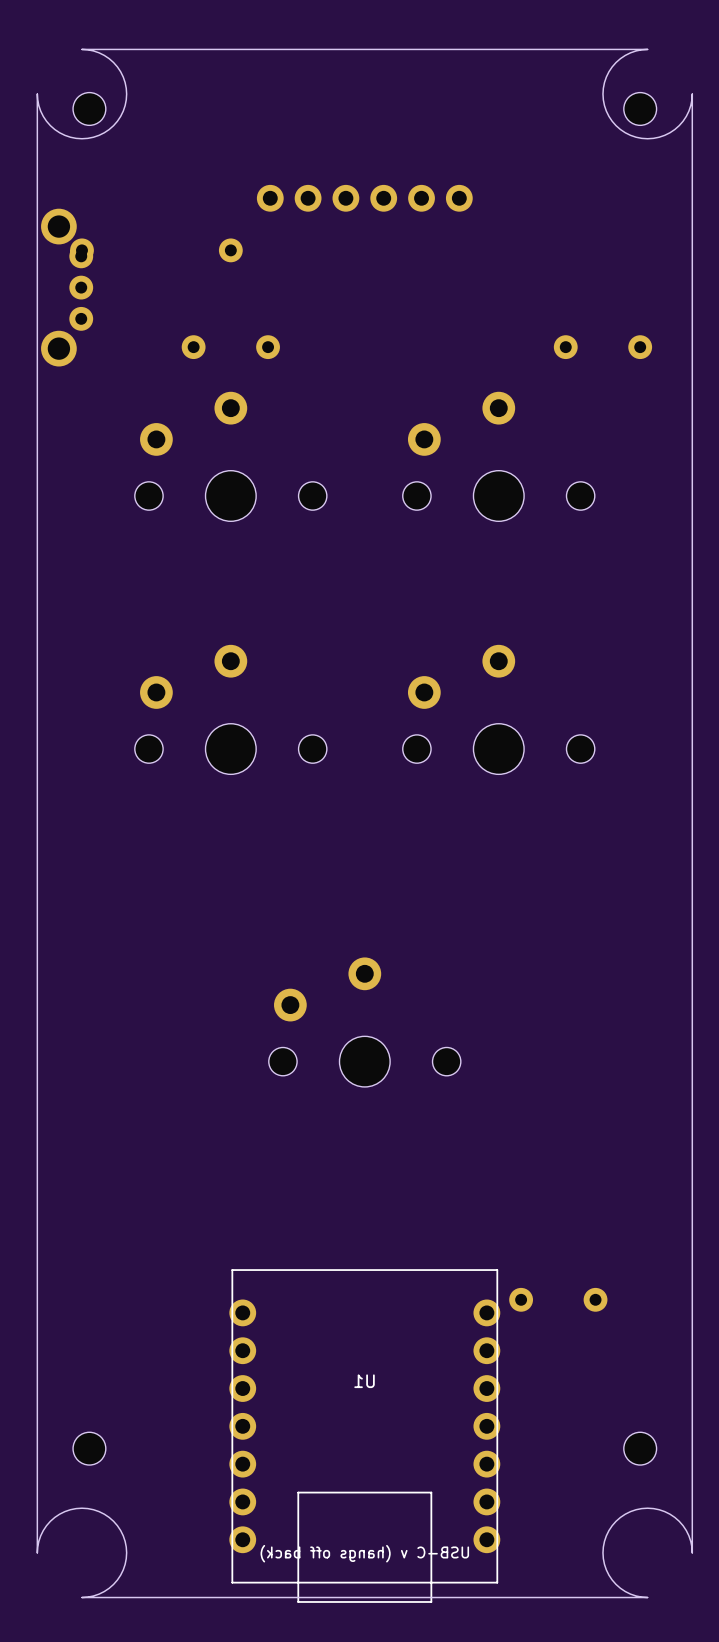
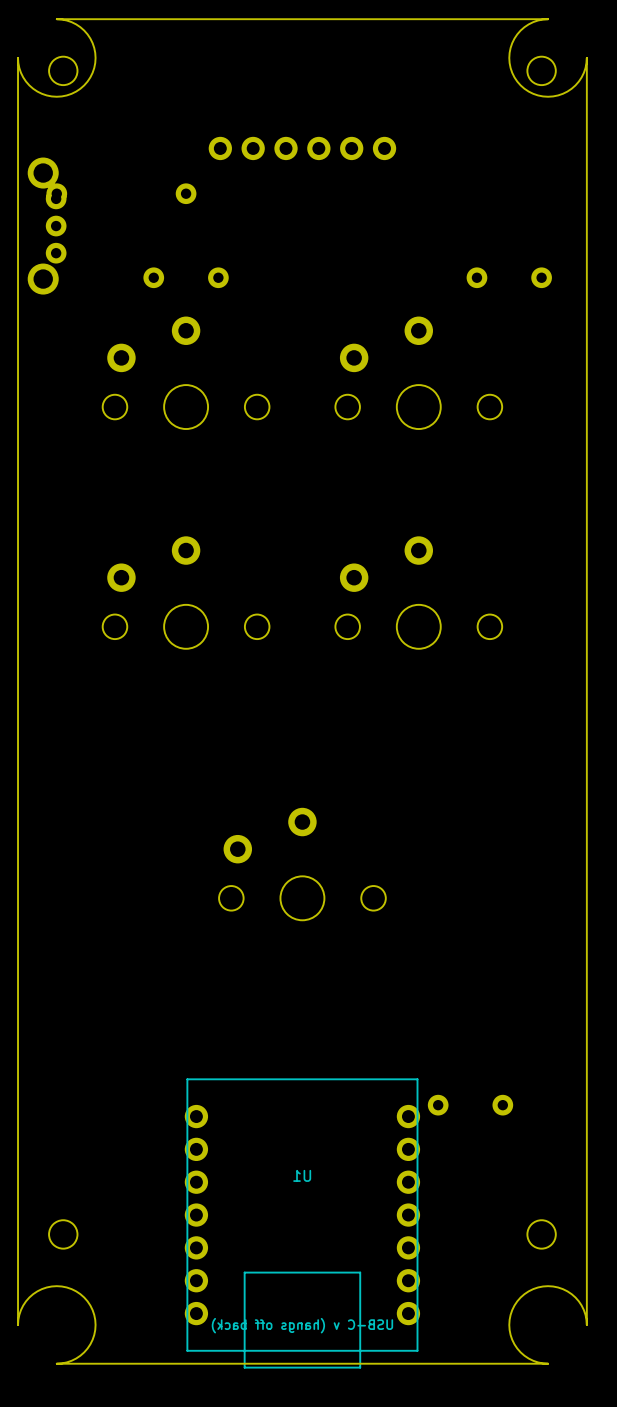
part footprint: [41, 208, 94, 367] -> [27, 157, 67, 295]

